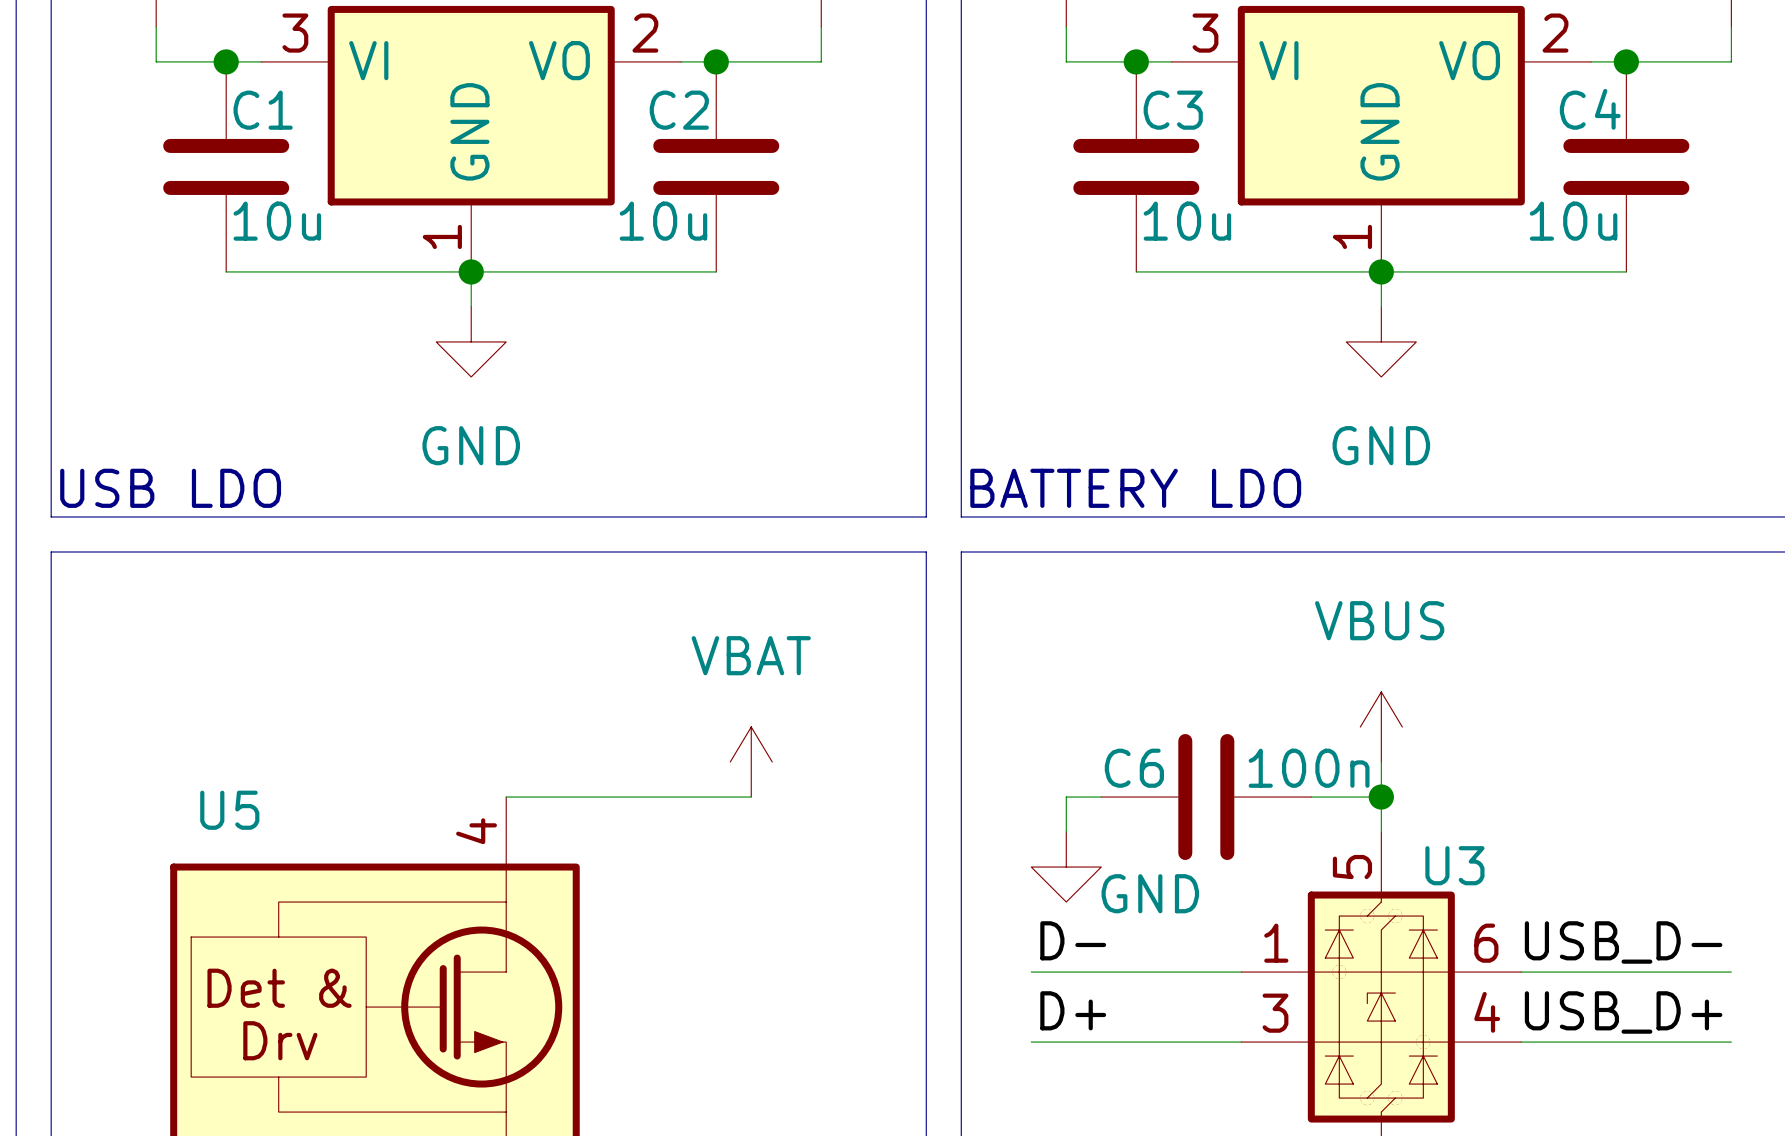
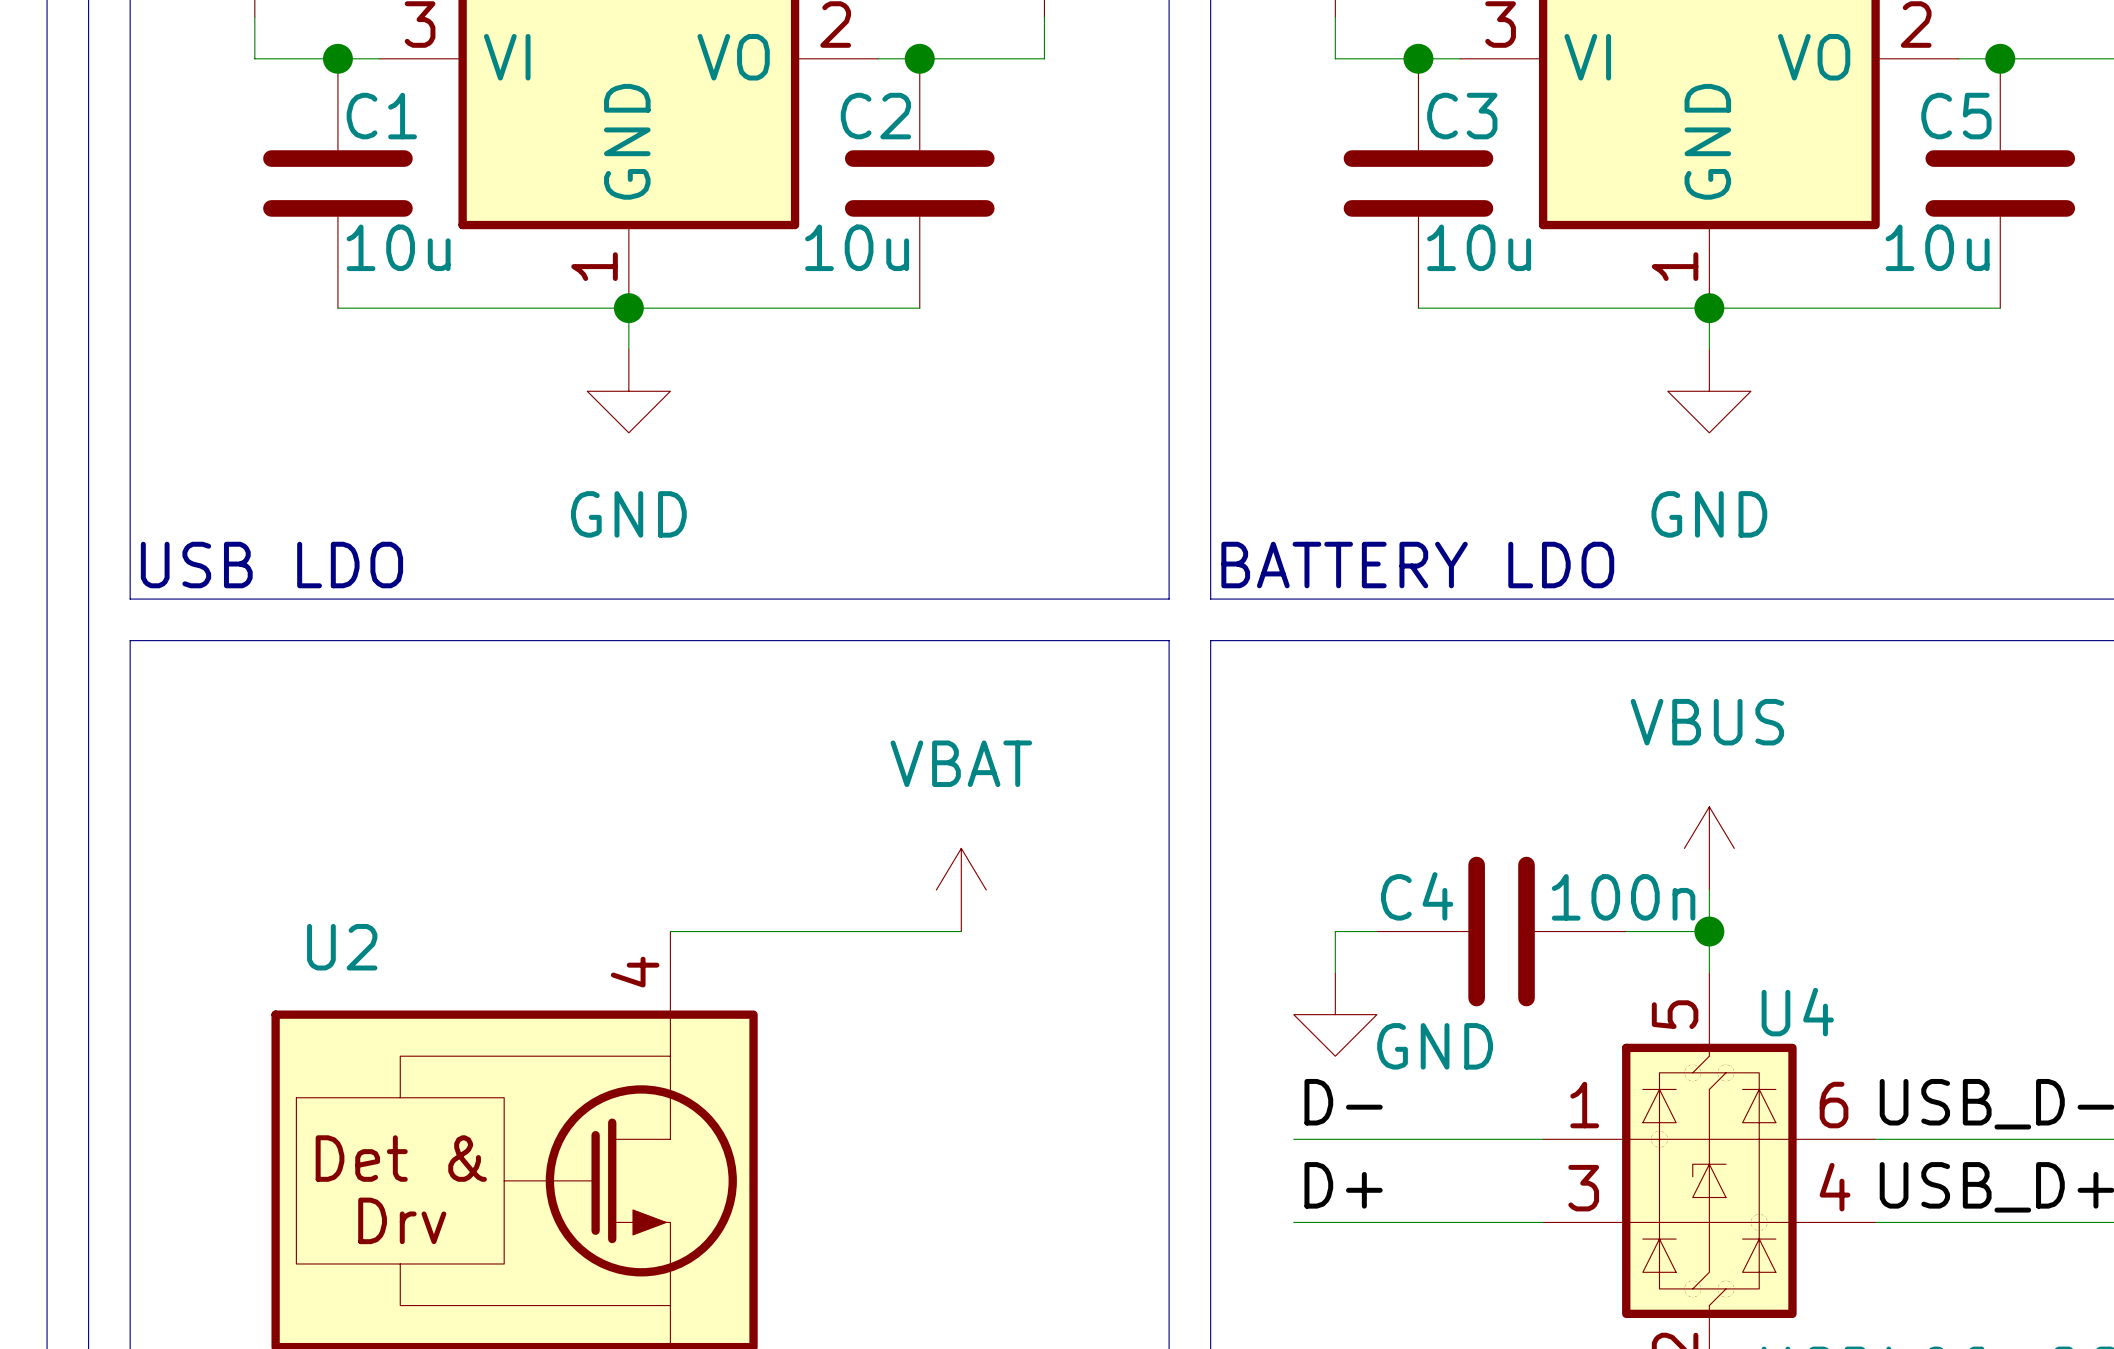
C4 name: C4 (1590, 109) -> C5 (1956, 116)
C6 name: C6 (1134, 768) -> C4 (1417, 896)
U5 name: U5 (229, 810) -> U2 (342, 947)
U3 name: U3 (1454, 865) -> U4 (1797, 1012)

